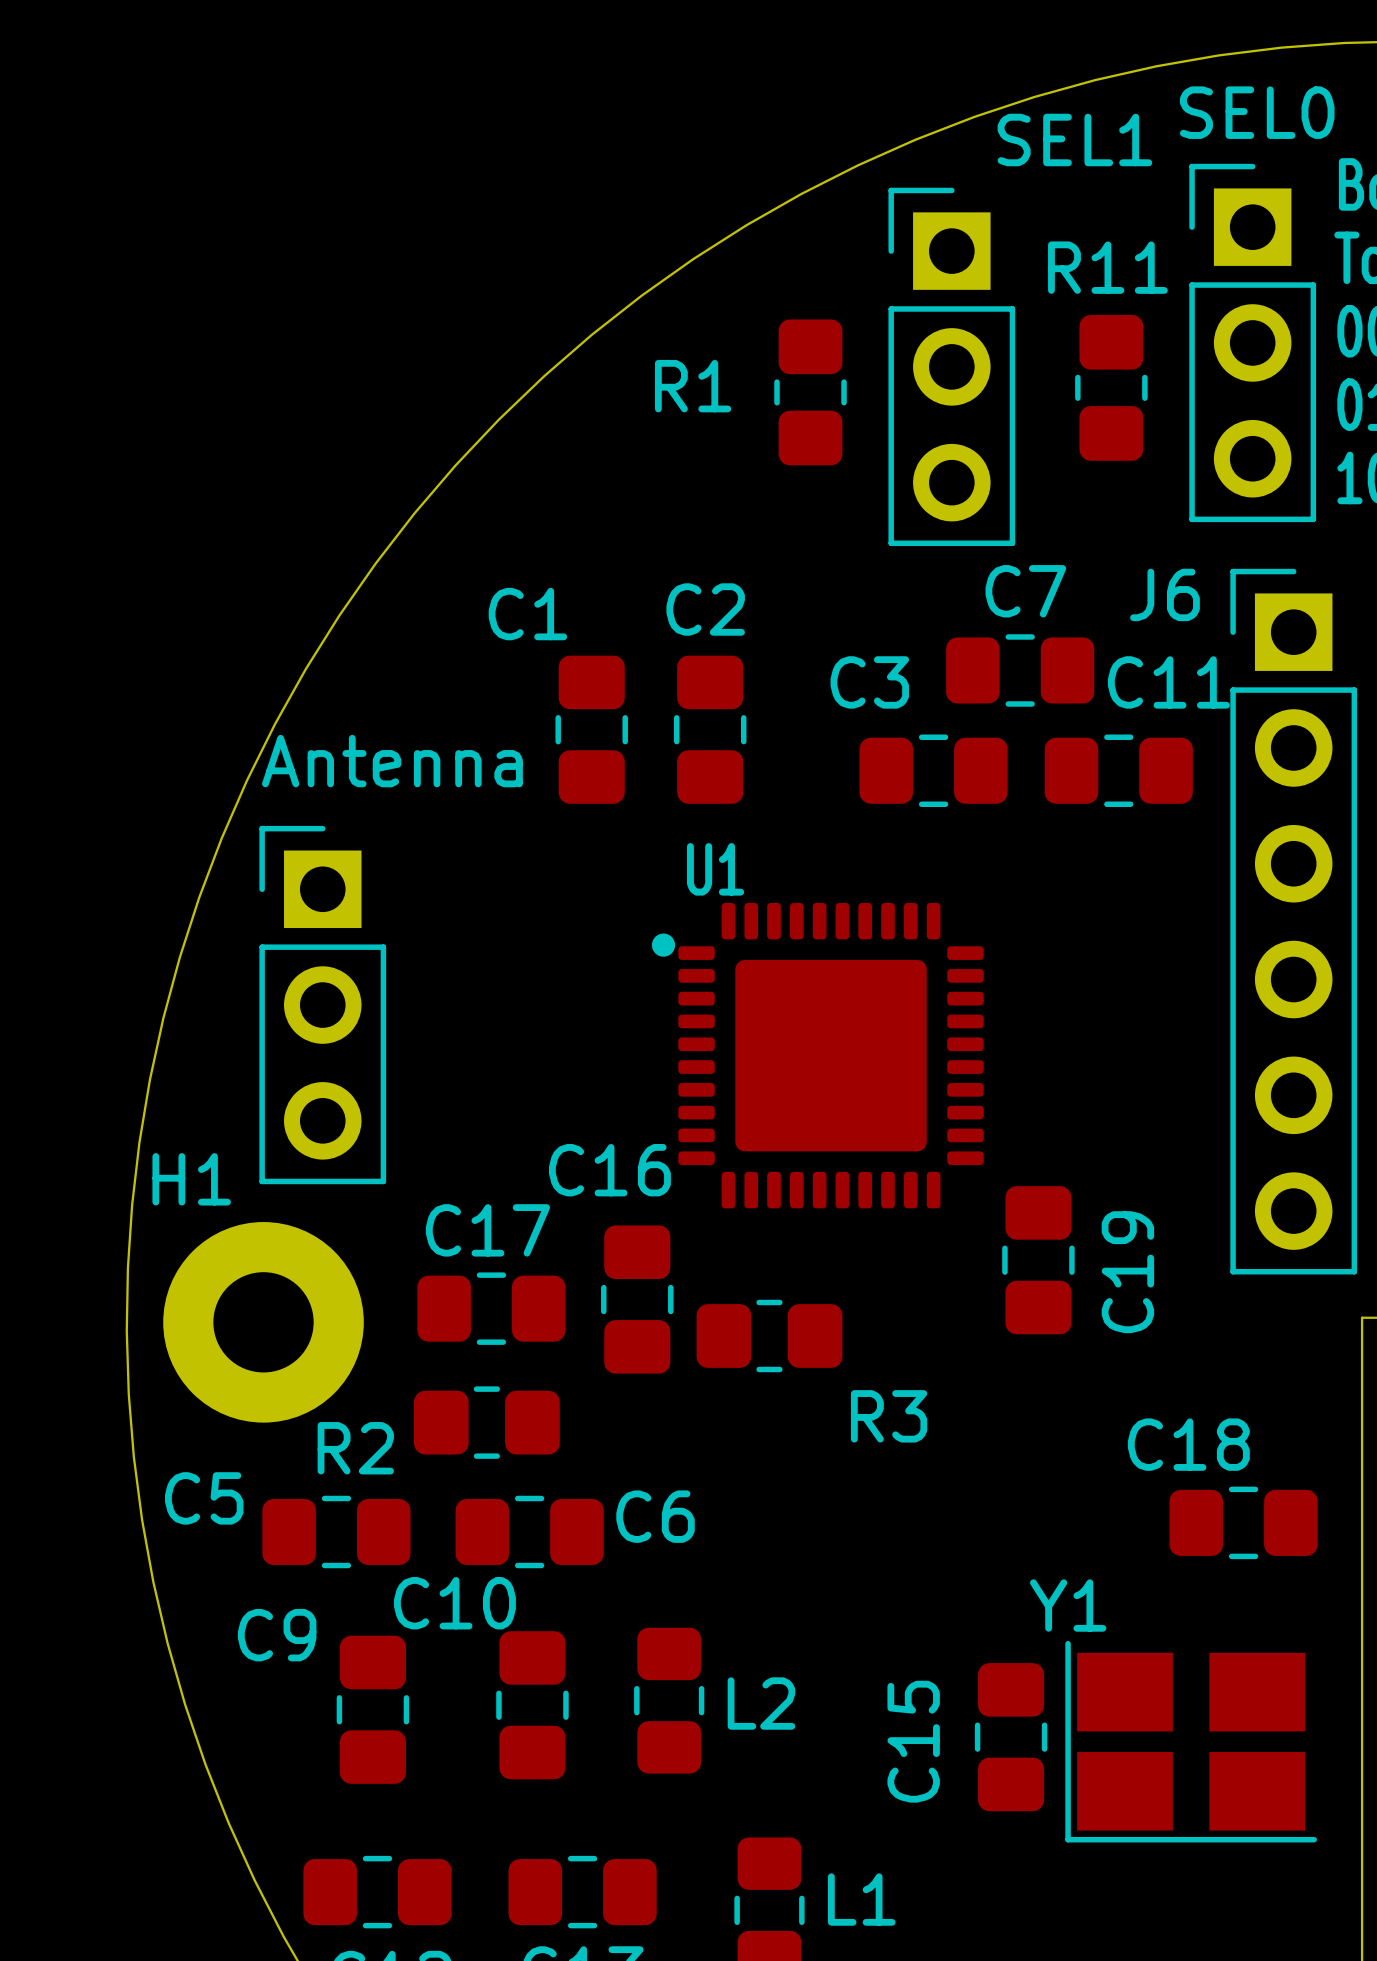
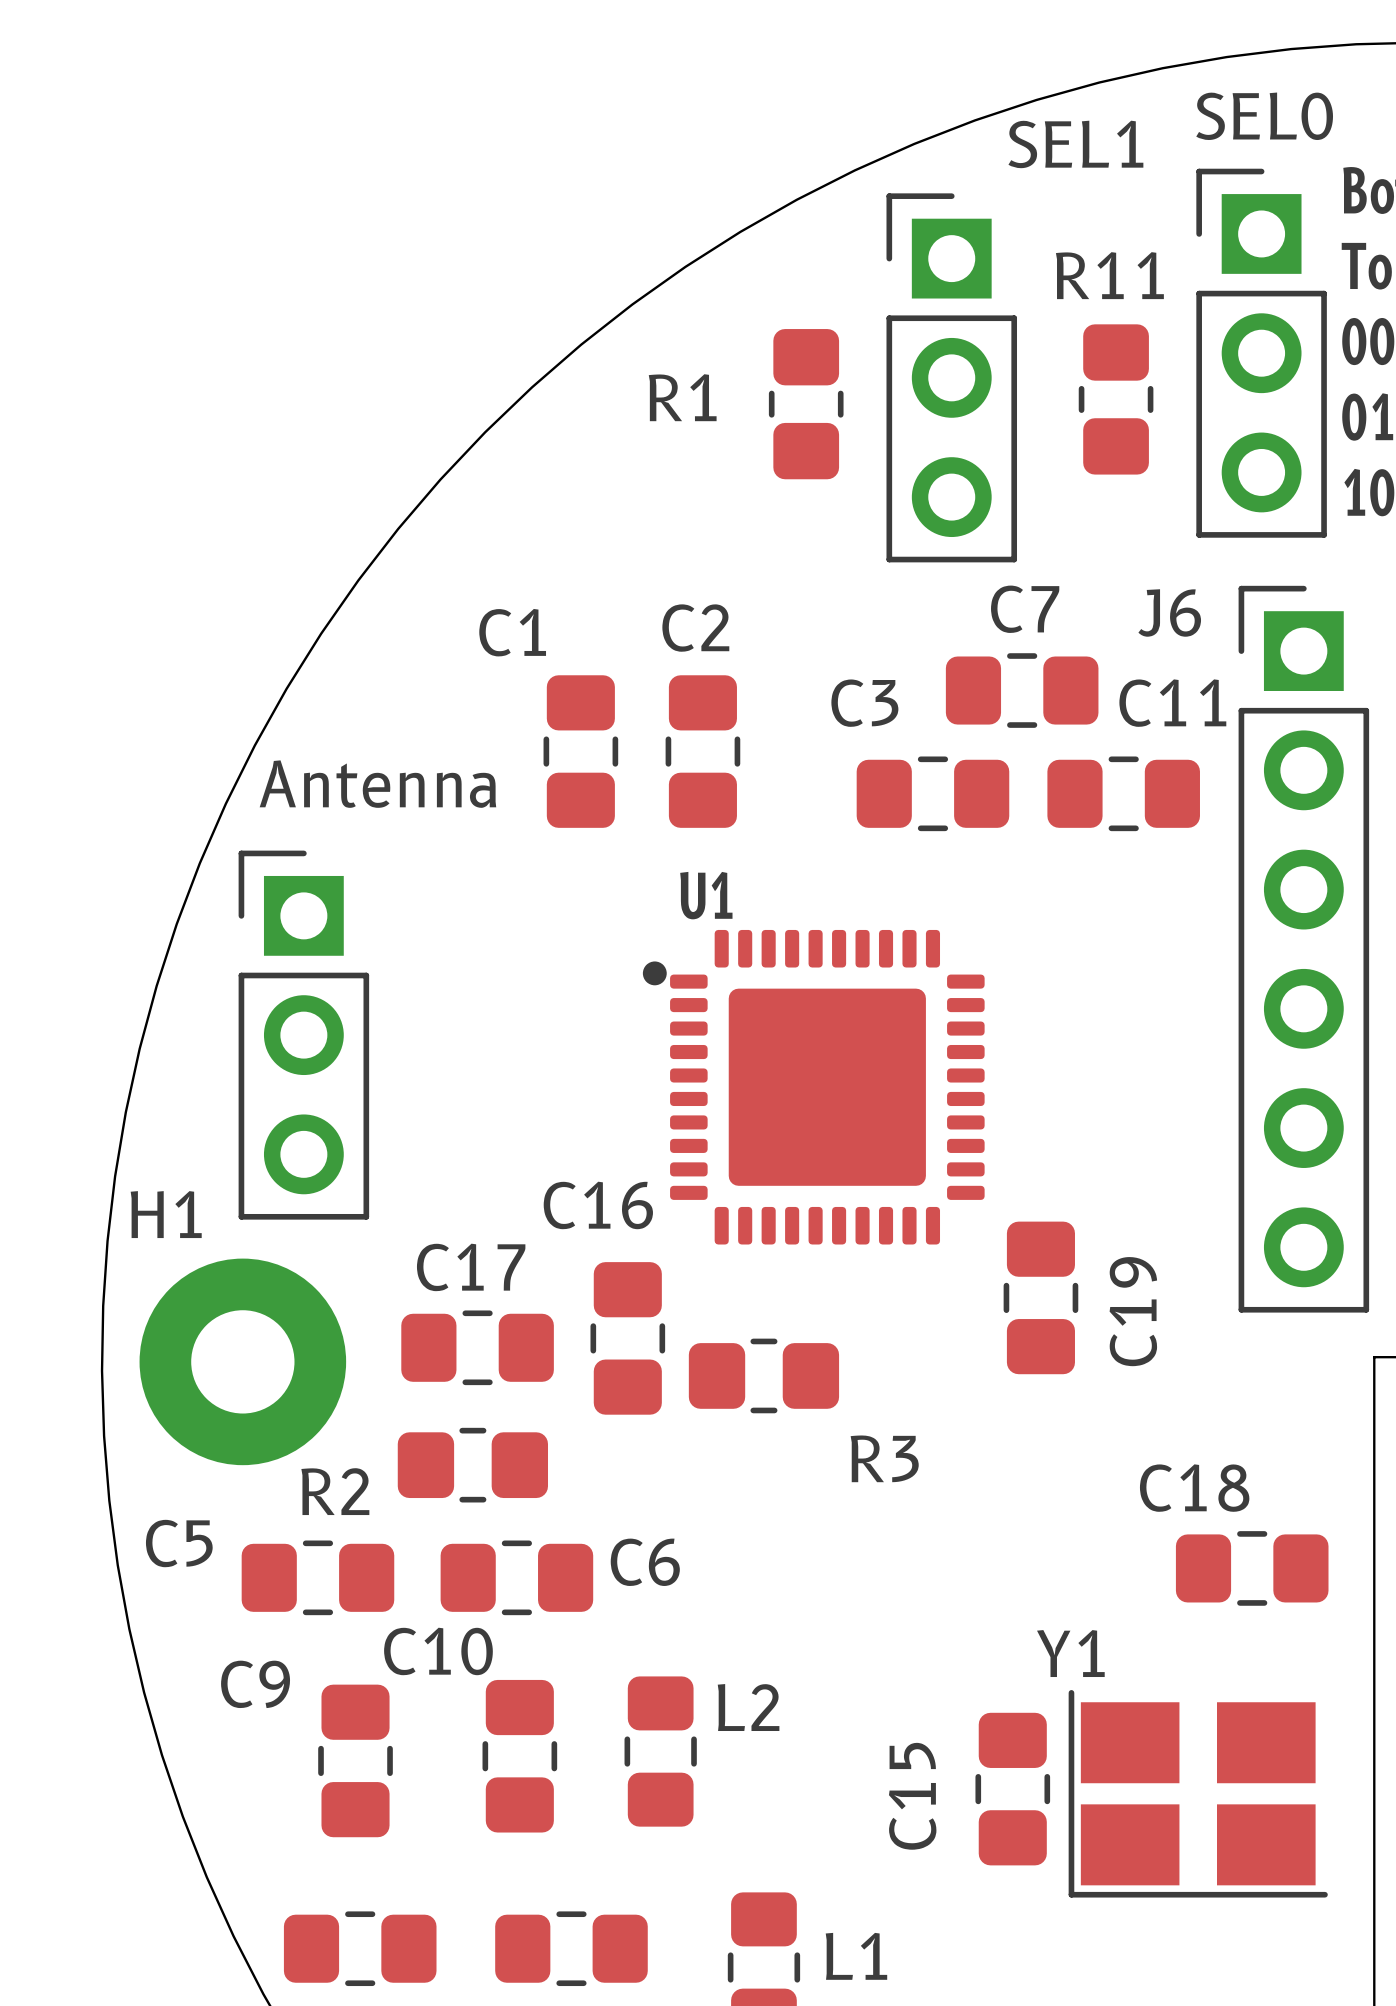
L2 name position: L2 (761, 1703) -> L2 (748, 1707)

